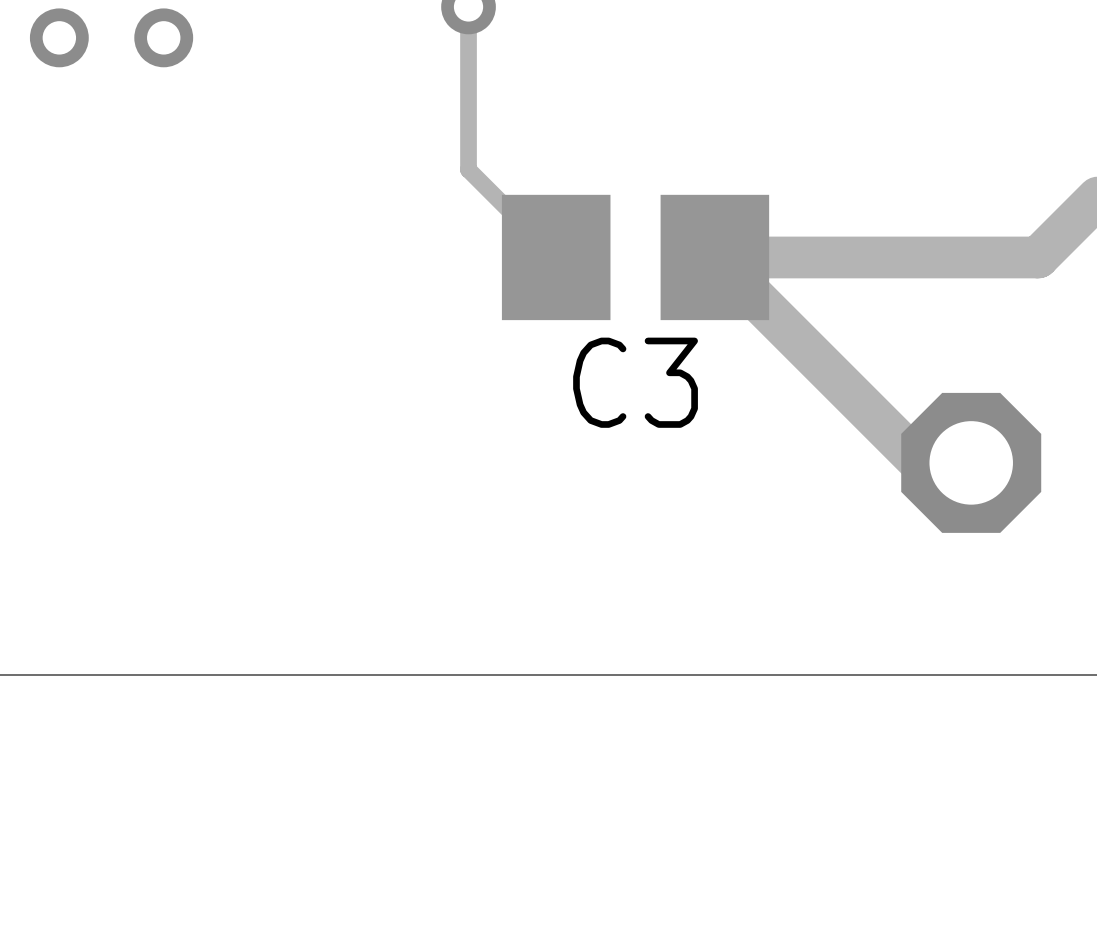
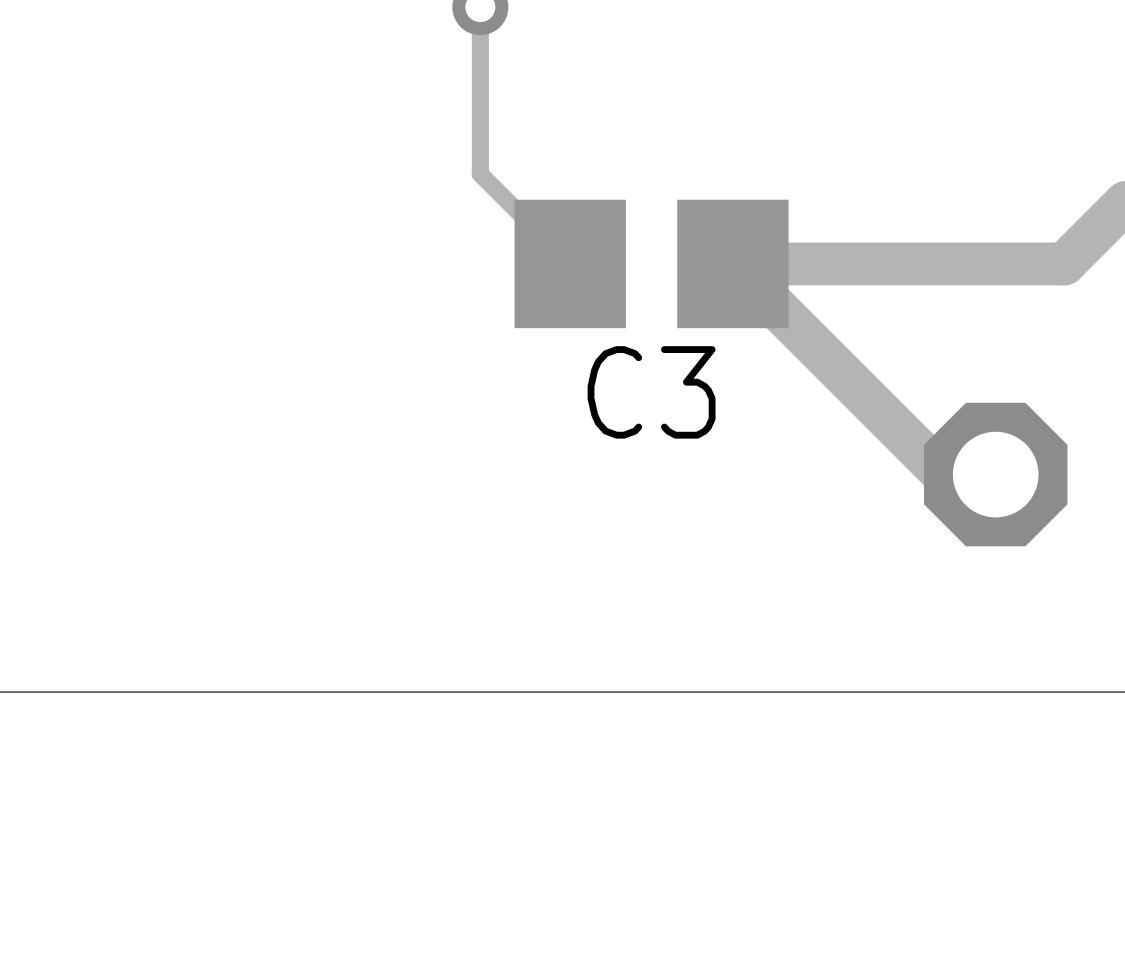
via: (59, 37) -> none
via: (163, 37) -> none

